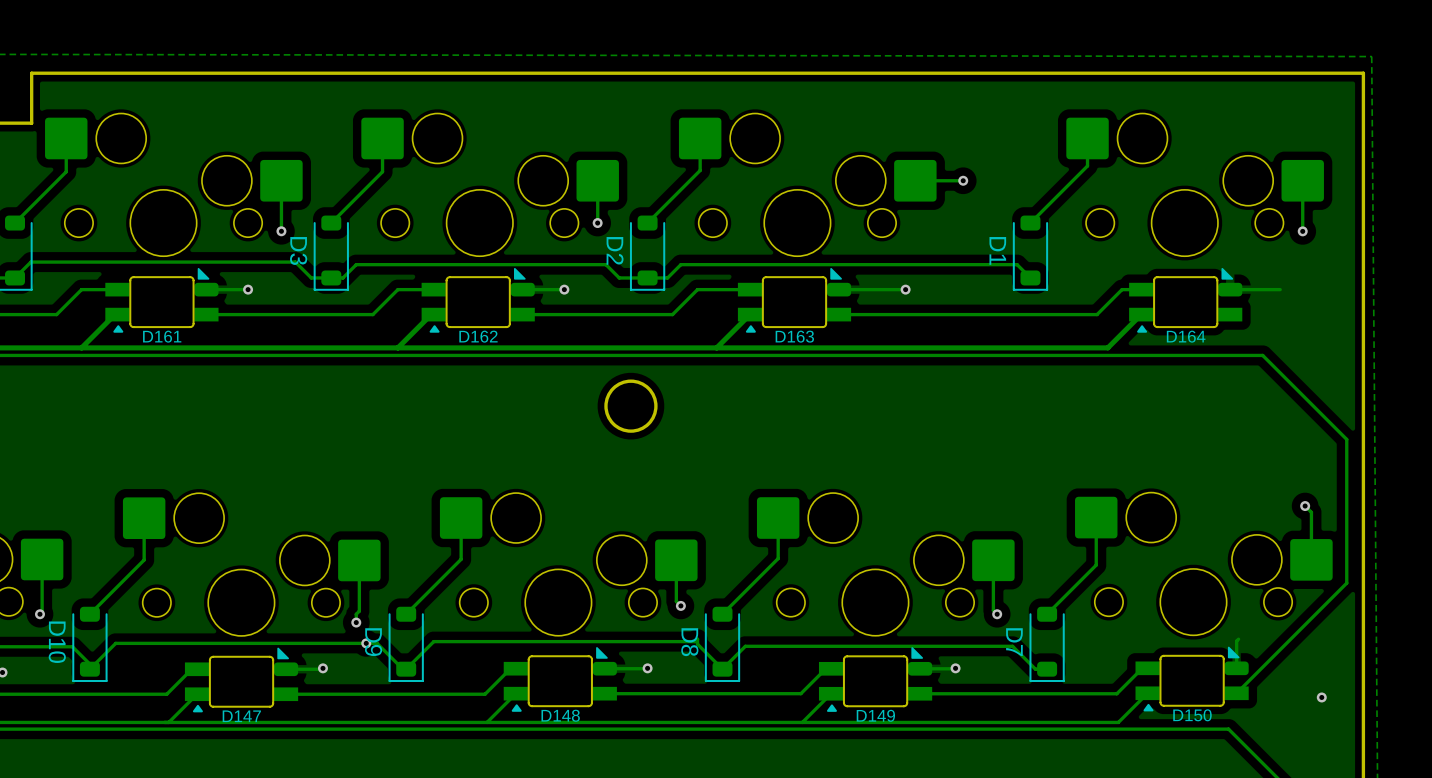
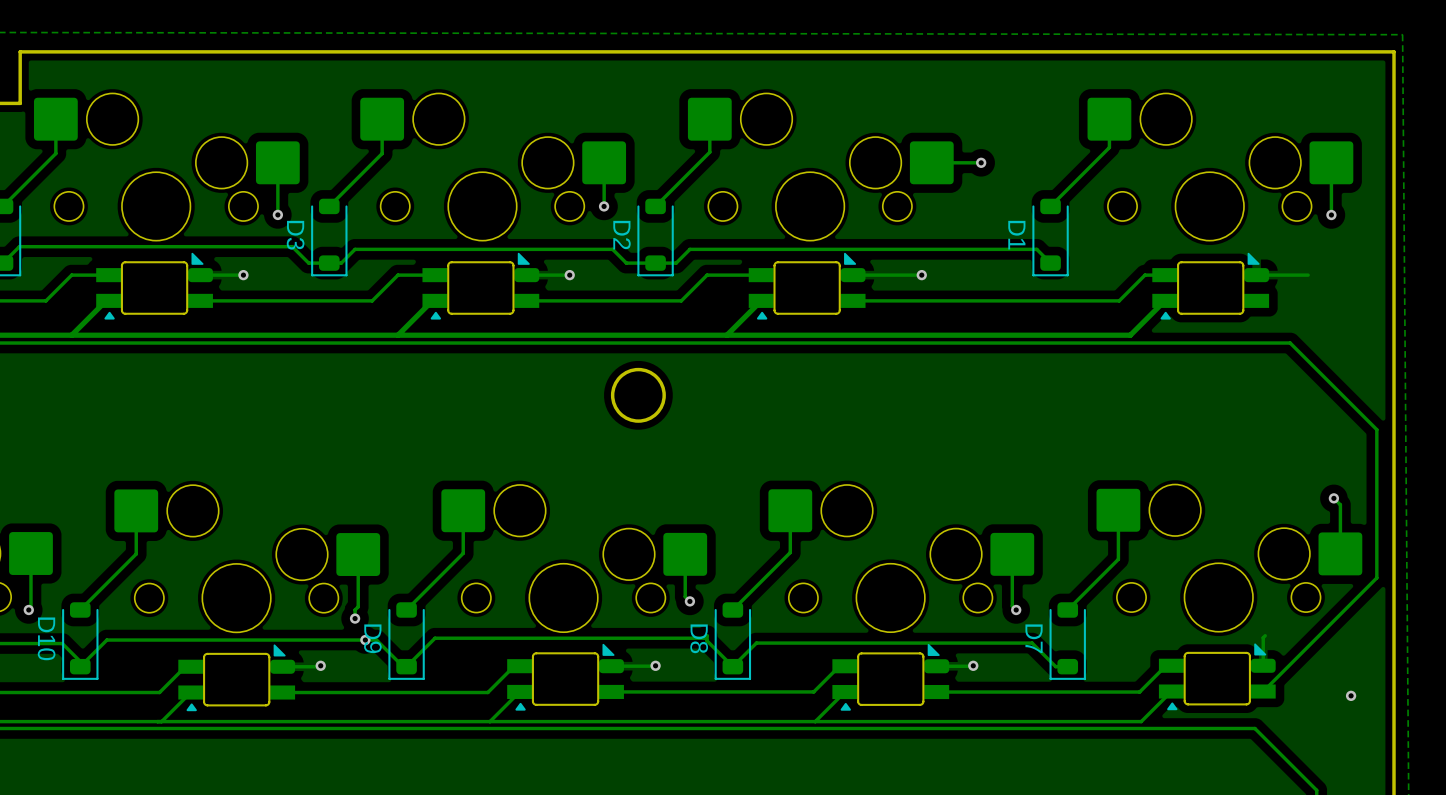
D161 name: D161 (162, 336) -> none
D162 name: D162 (478, 336) -> none
D163 name: D163 (794, 336) -> none
D164 name: D164 (1186, 336) -> none
D148 name: D148 (560, 715) -> none
D149 name: D149 (875, 715) -> none
D150 name: D150 (1192, 715) -> none
D147 name: D147 (241, 716) -> none

